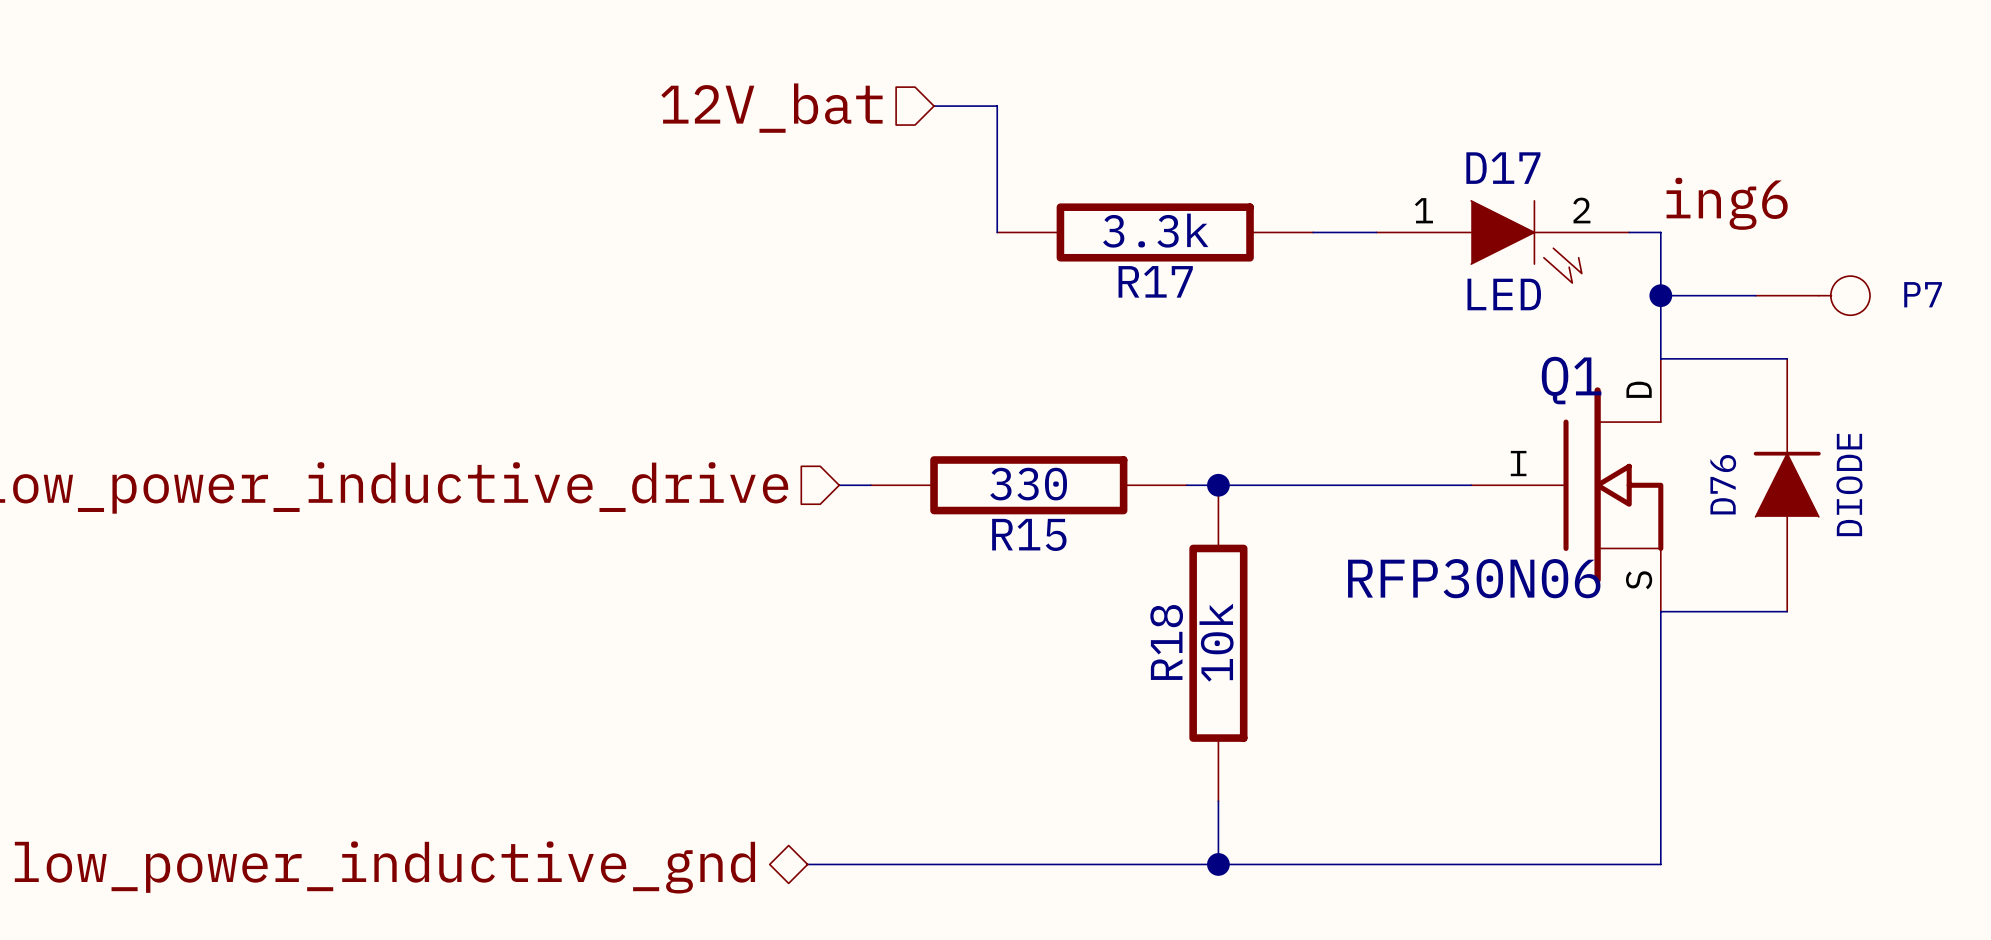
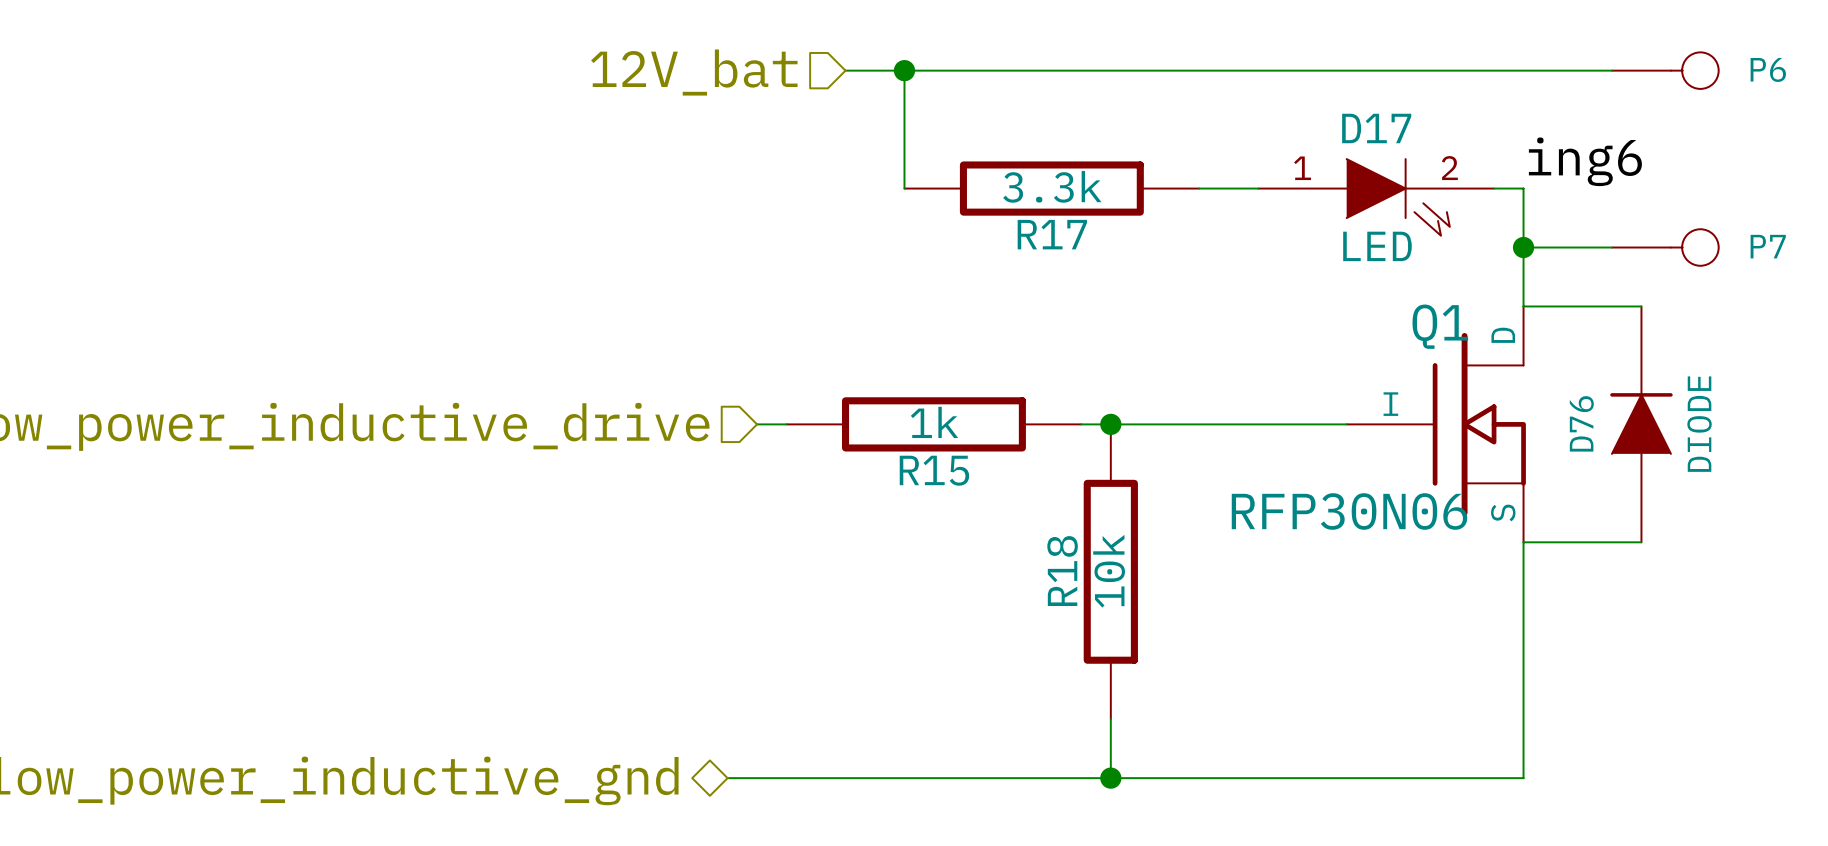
wire: none -> (904, 70) (1611, 70)
junction: none -> (904, 70)
P6: none -> (1665, 70)
R15 value: 330 (1028, 484) -> 1k (934, 422)

